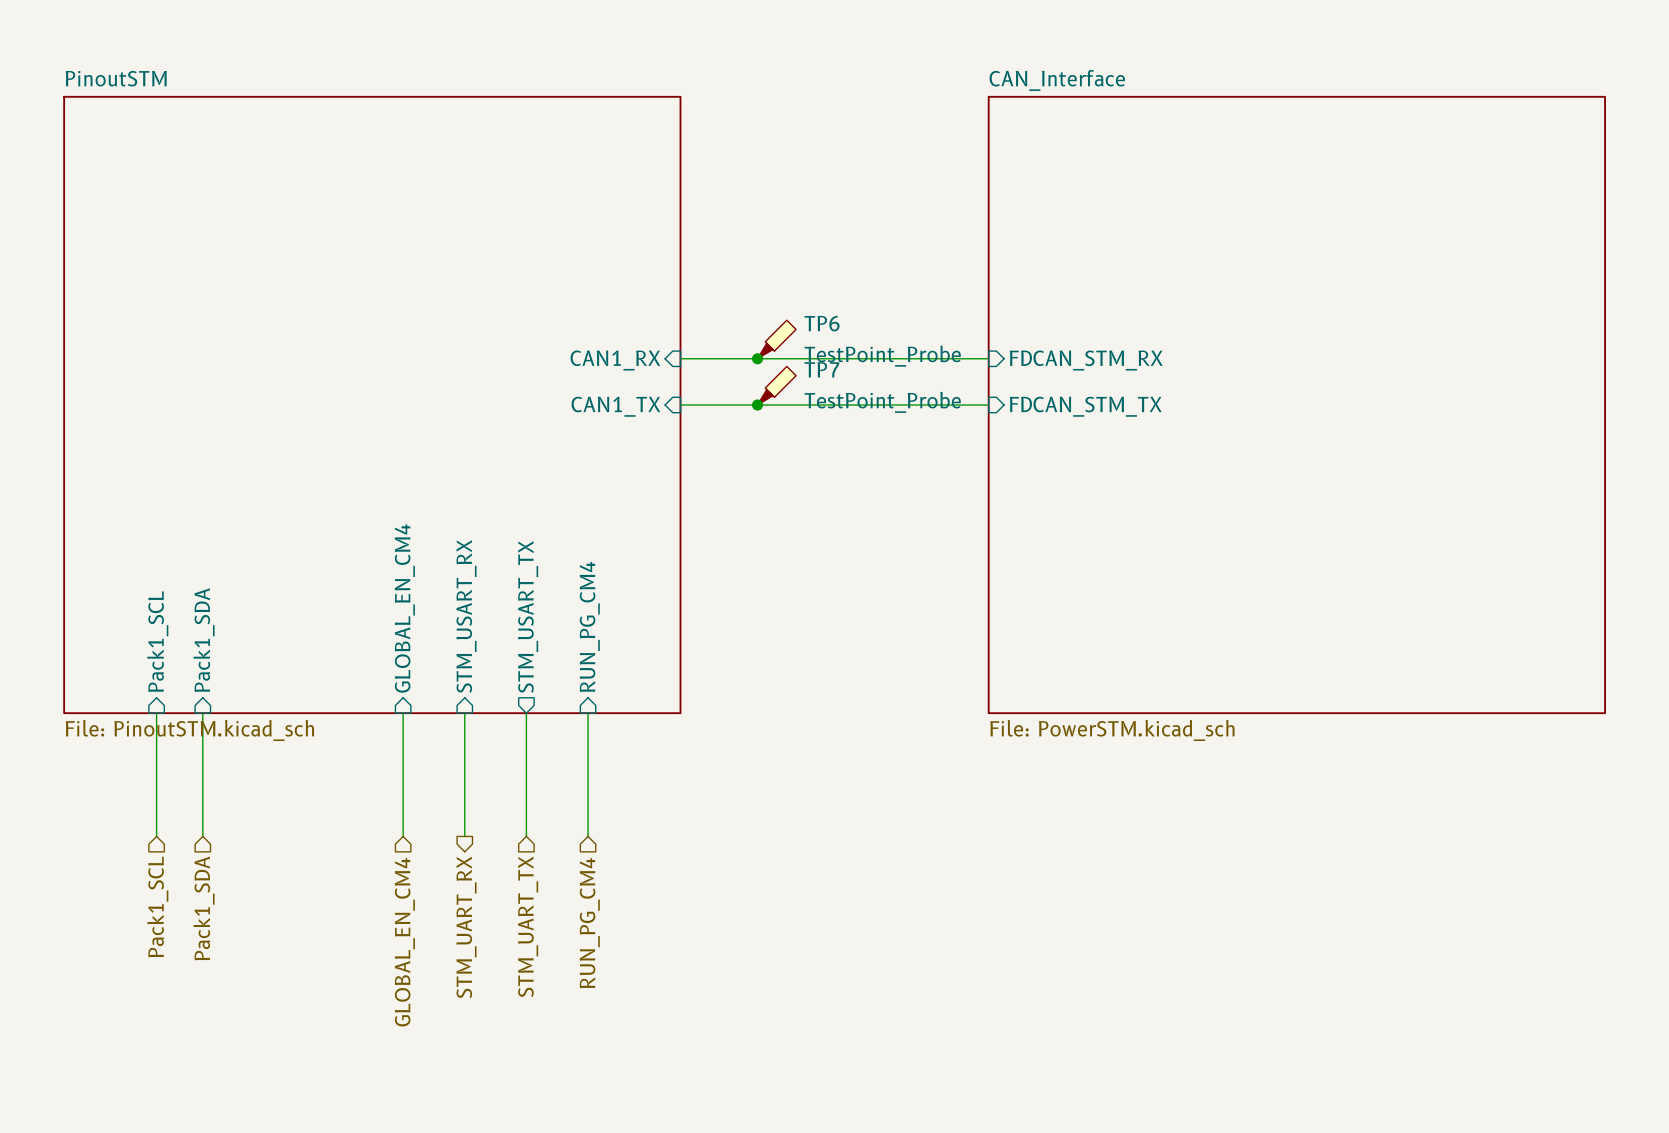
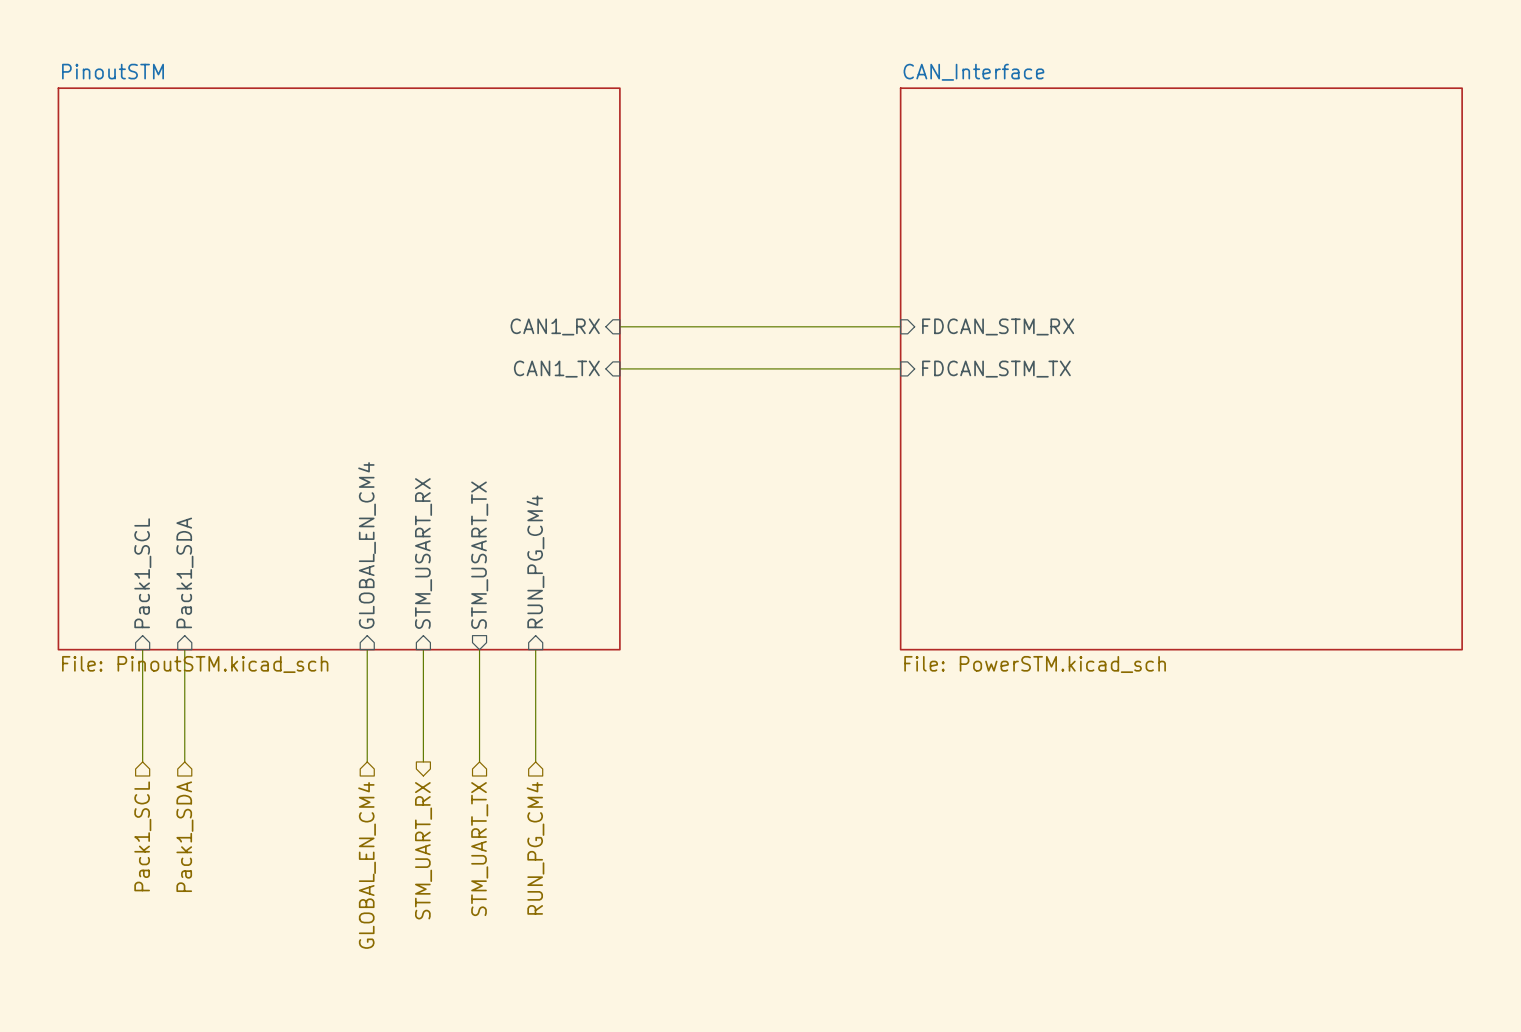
TP6: TestPoint_Probe (776, 339) -> none
junction: (757, 358) -> none
TP7: TestPoint_Probe (776, 385) -> none
junction: (757, 404) -> none

